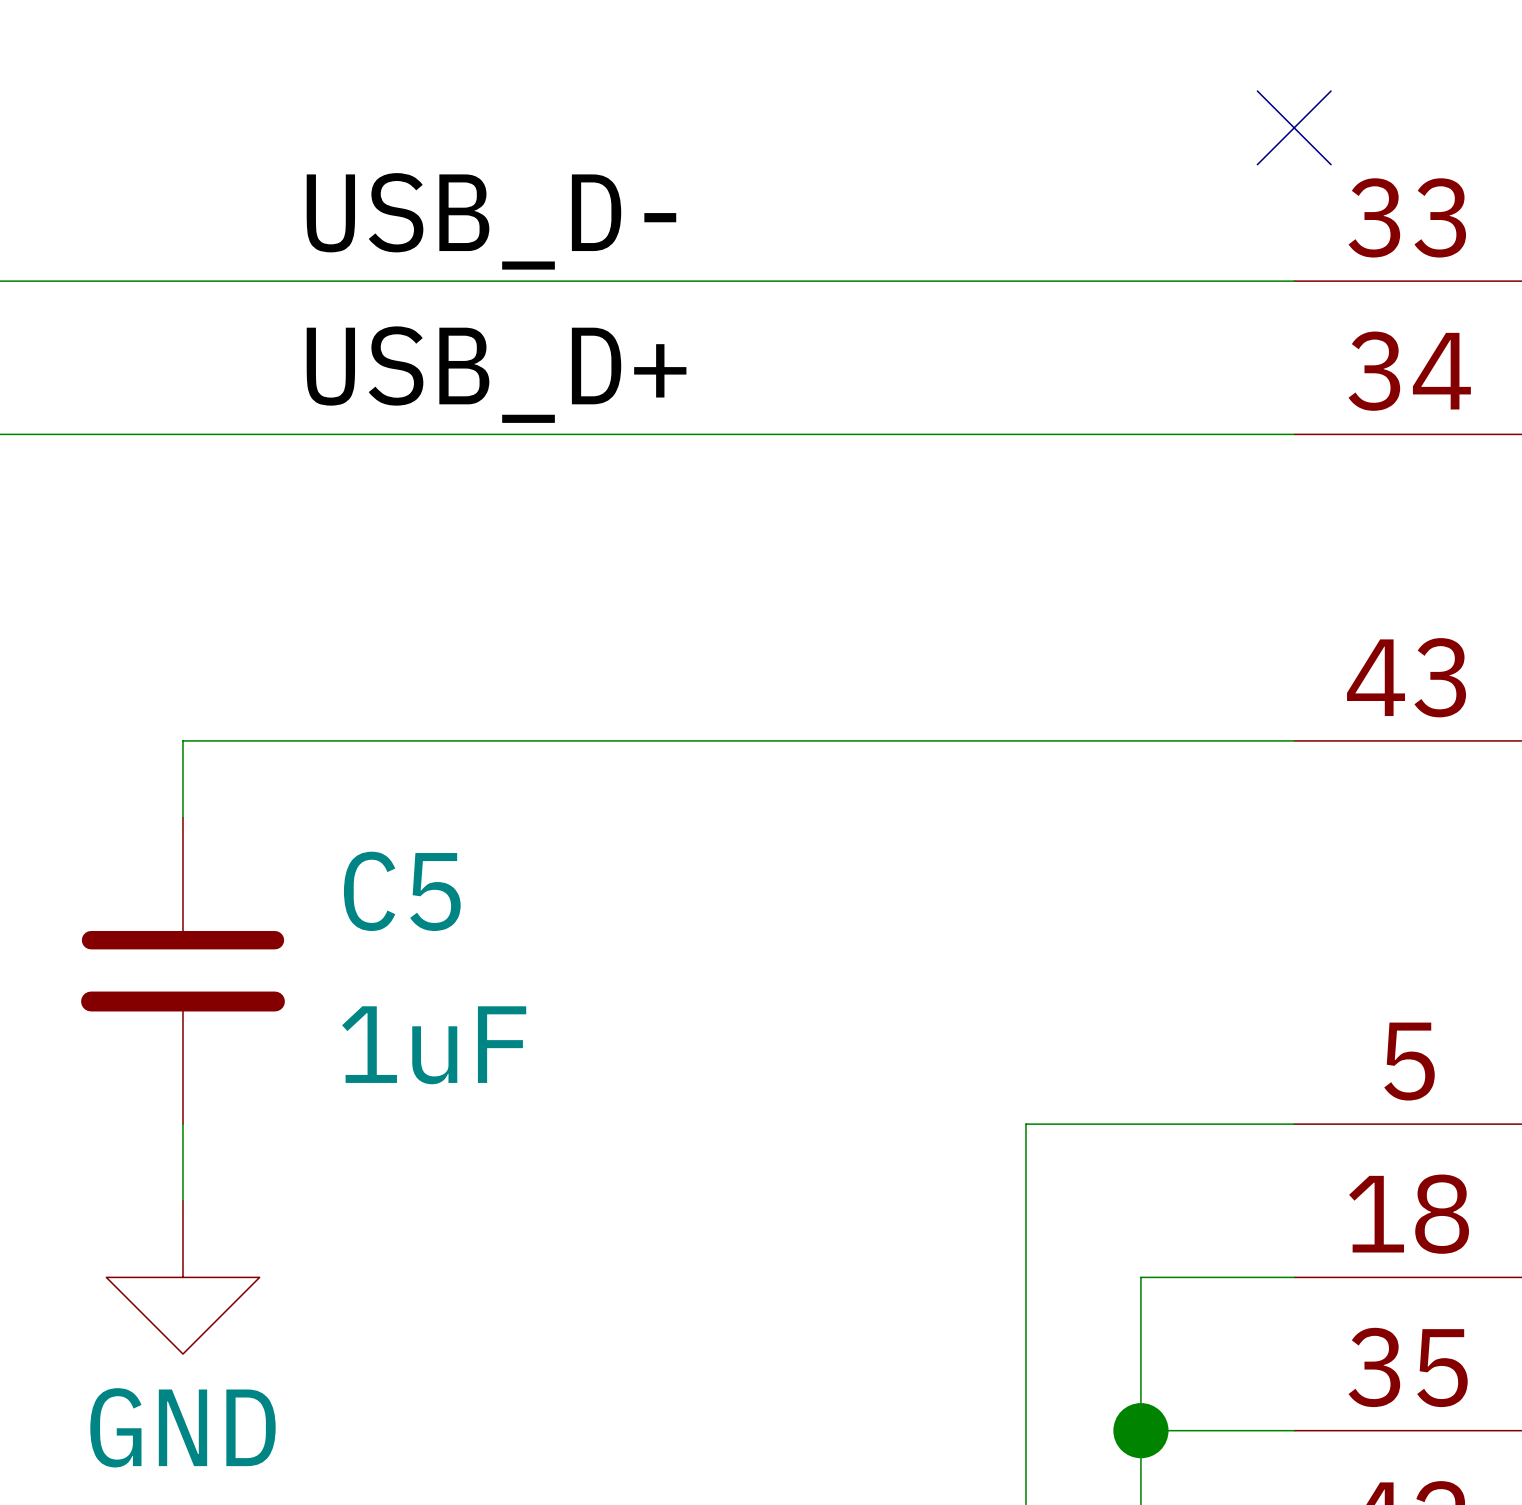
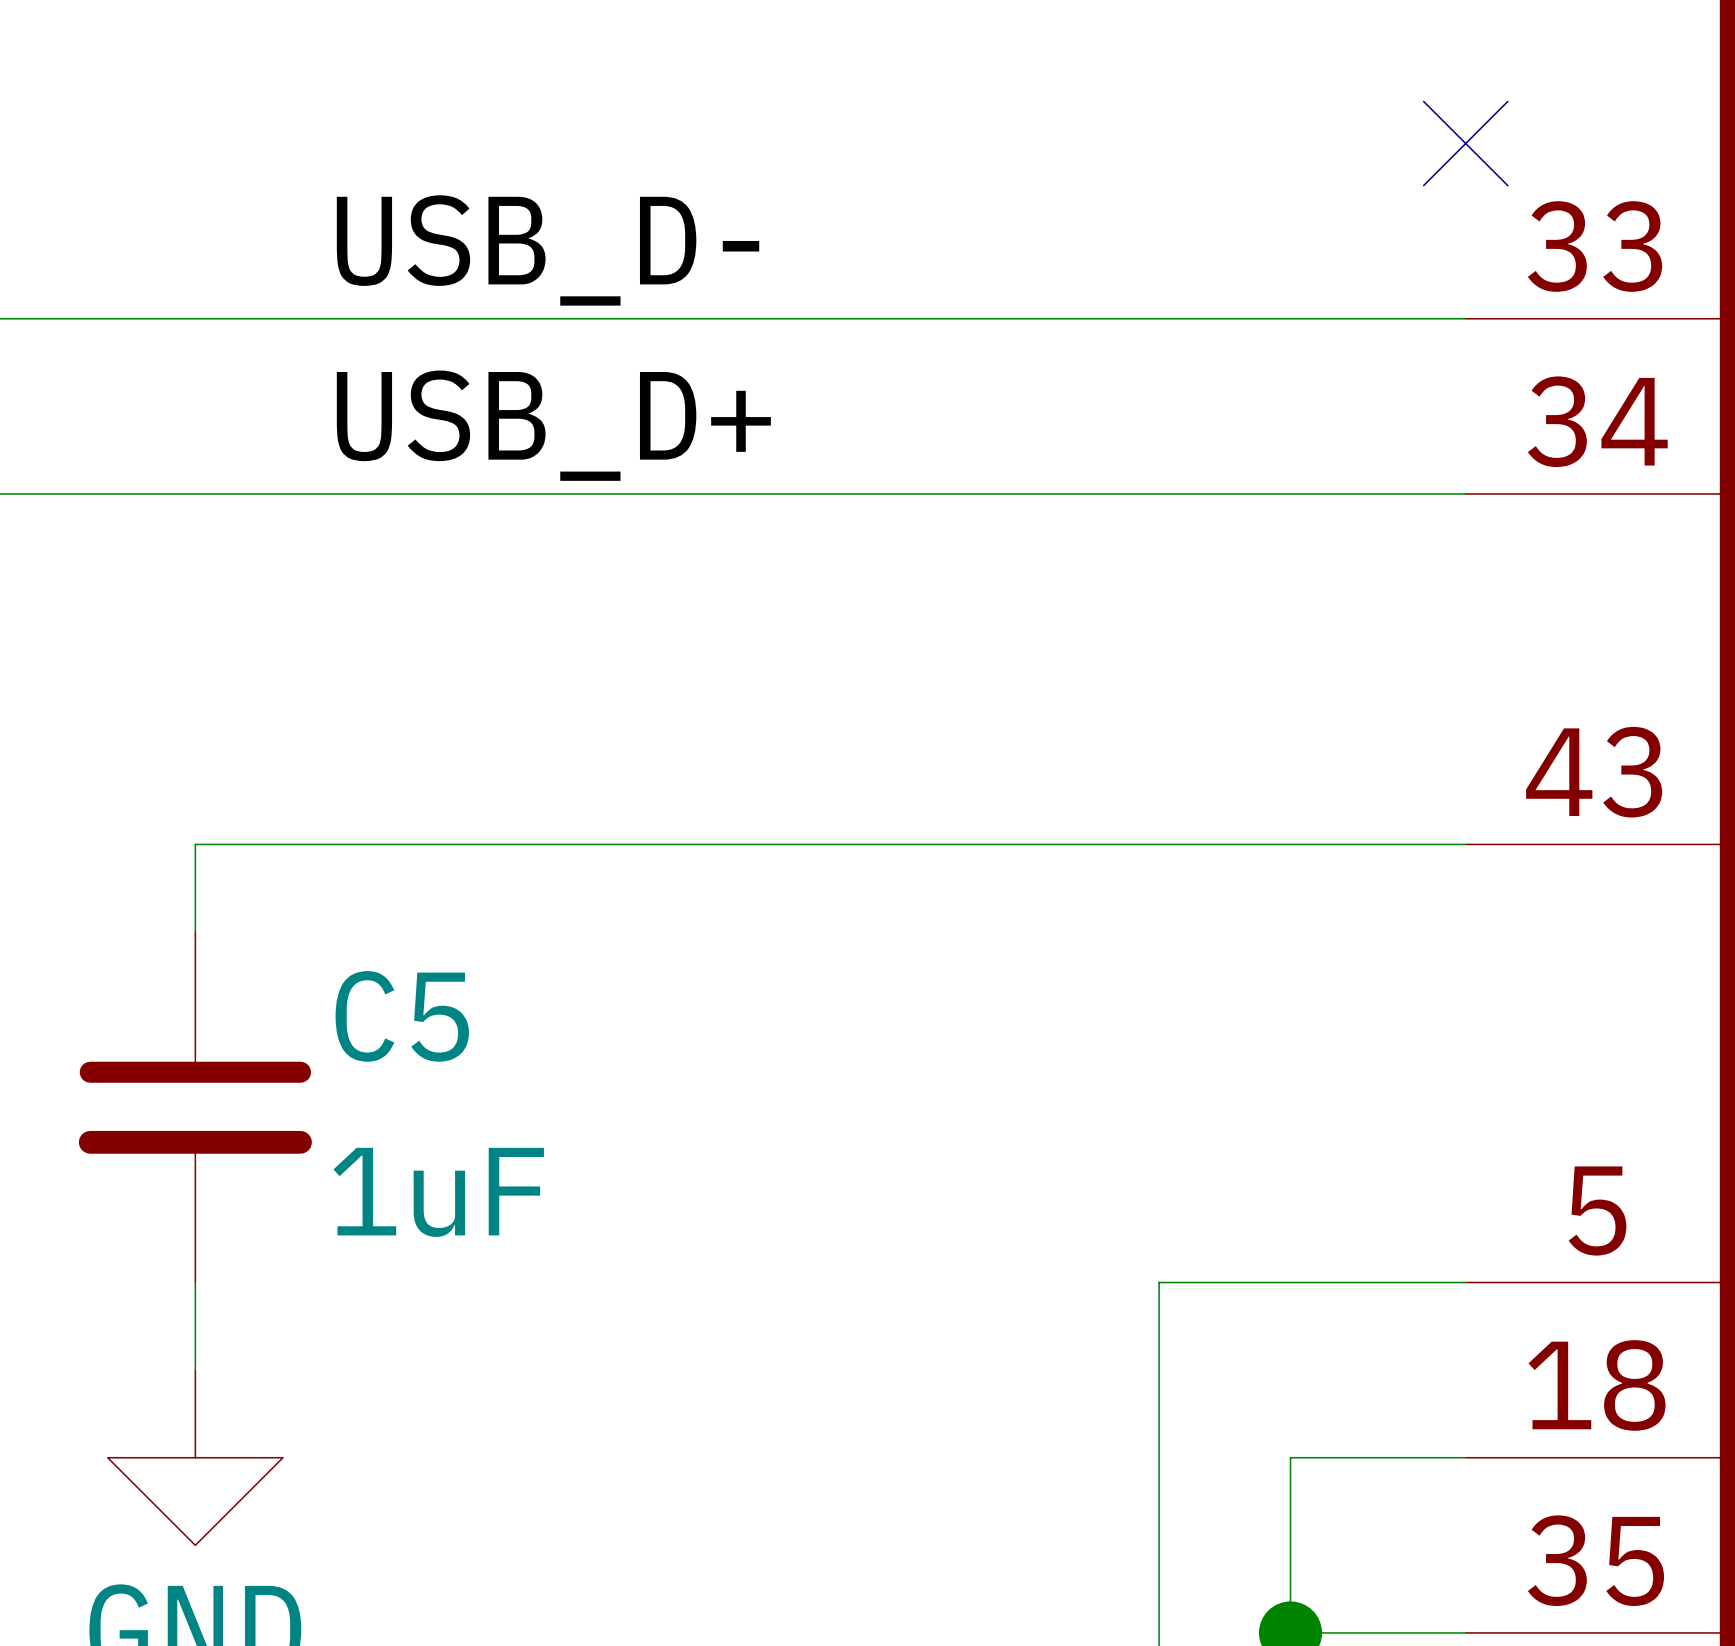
C5 name position: C5 (402, 891) -> C5 (402, 1016)
C5 value position: 1uF (434, 1045) -> 1uF (438, 1192)

